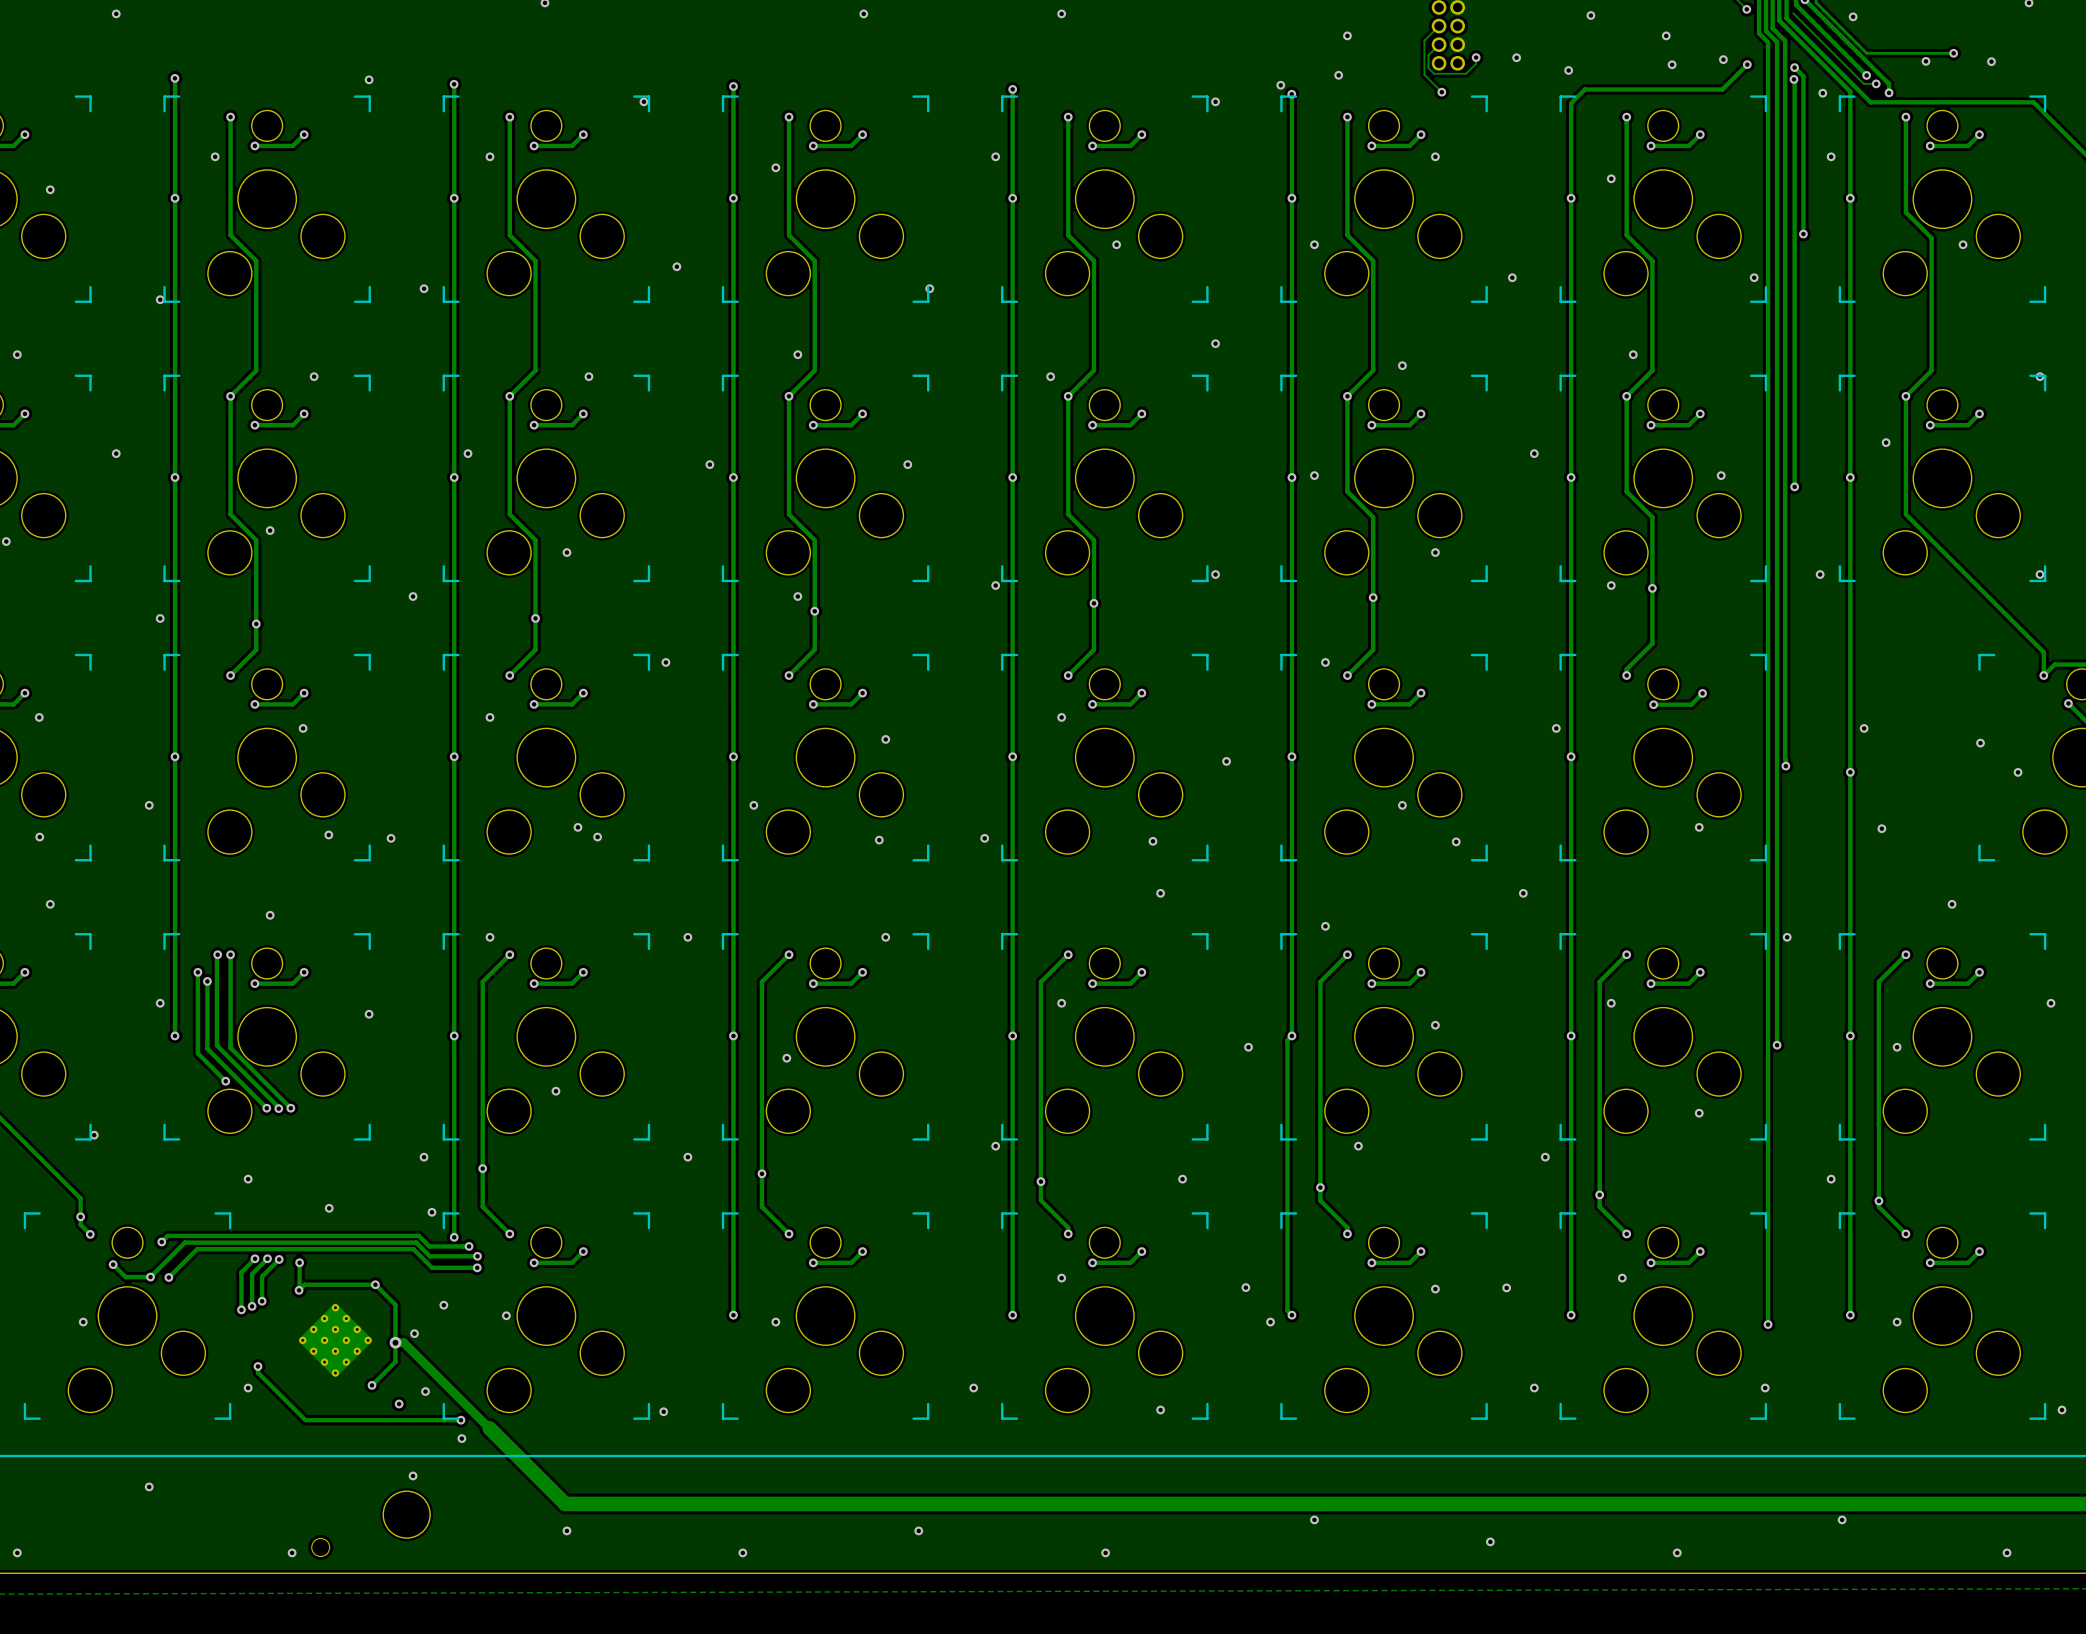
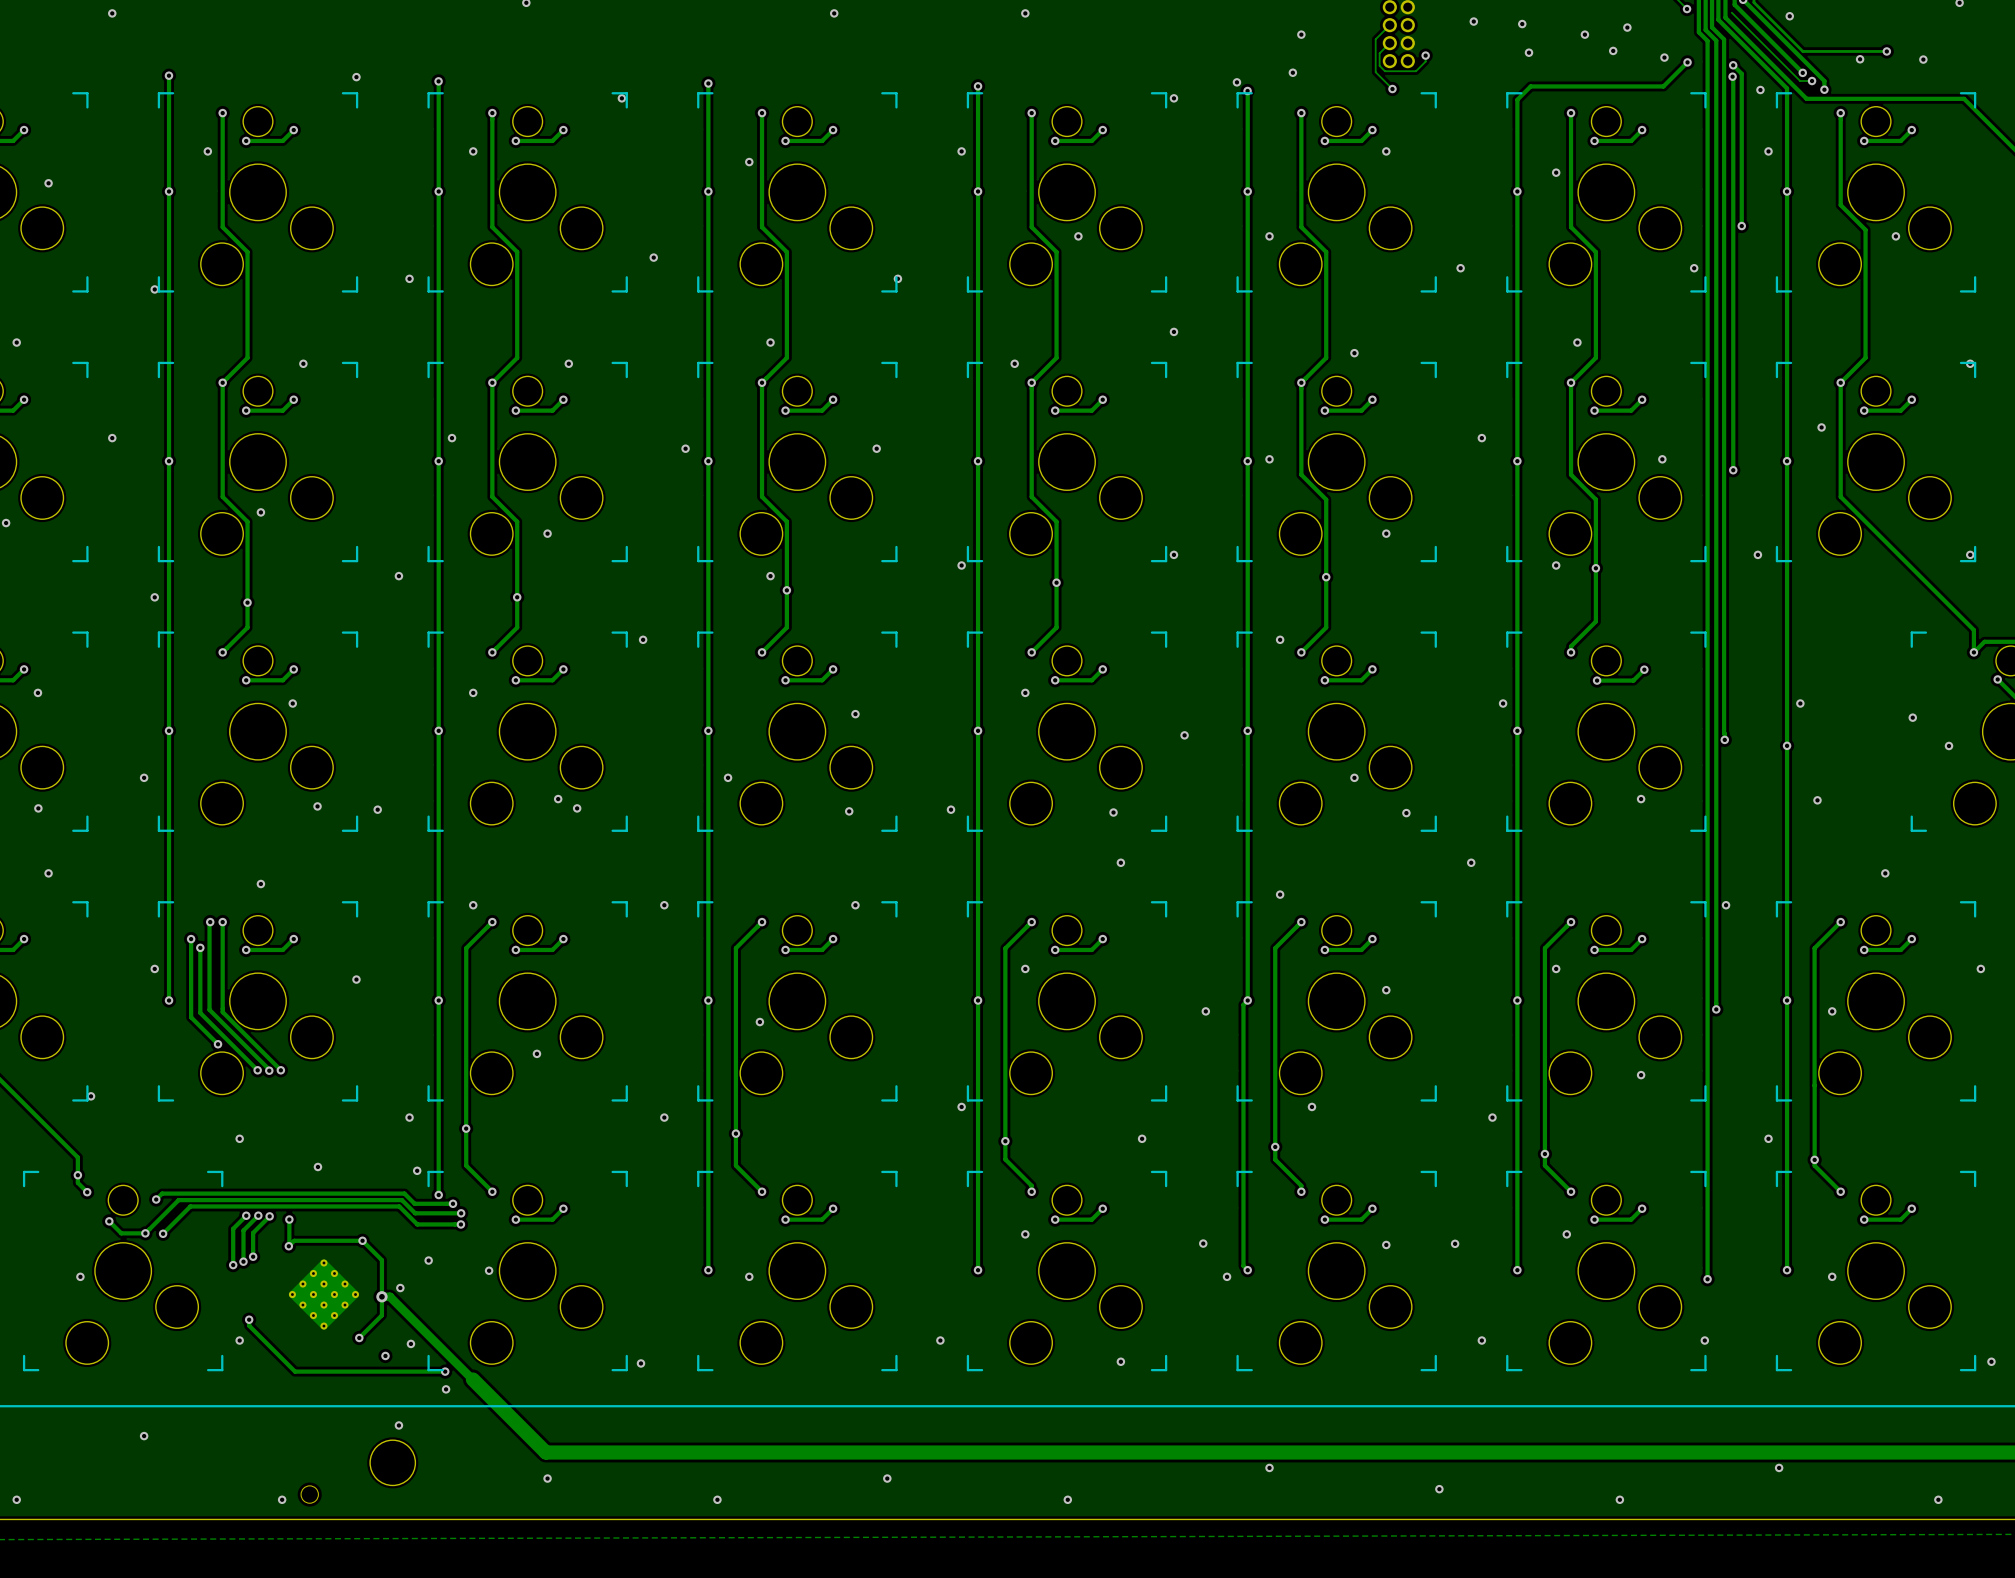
via: (1590, 15) -> none
via: none -> (1473, 21)
via: none -> (1522, 24)
via: none -> (1627, 27)
via: none -> (1584, 34)
via: (1666, 35) -> none
via: none -> (1613, 50)
via: none -> (1528, 52)
via: (1516, 57) -> none
via: (1672, 64) -> none
via: (1568, 70) -> none

